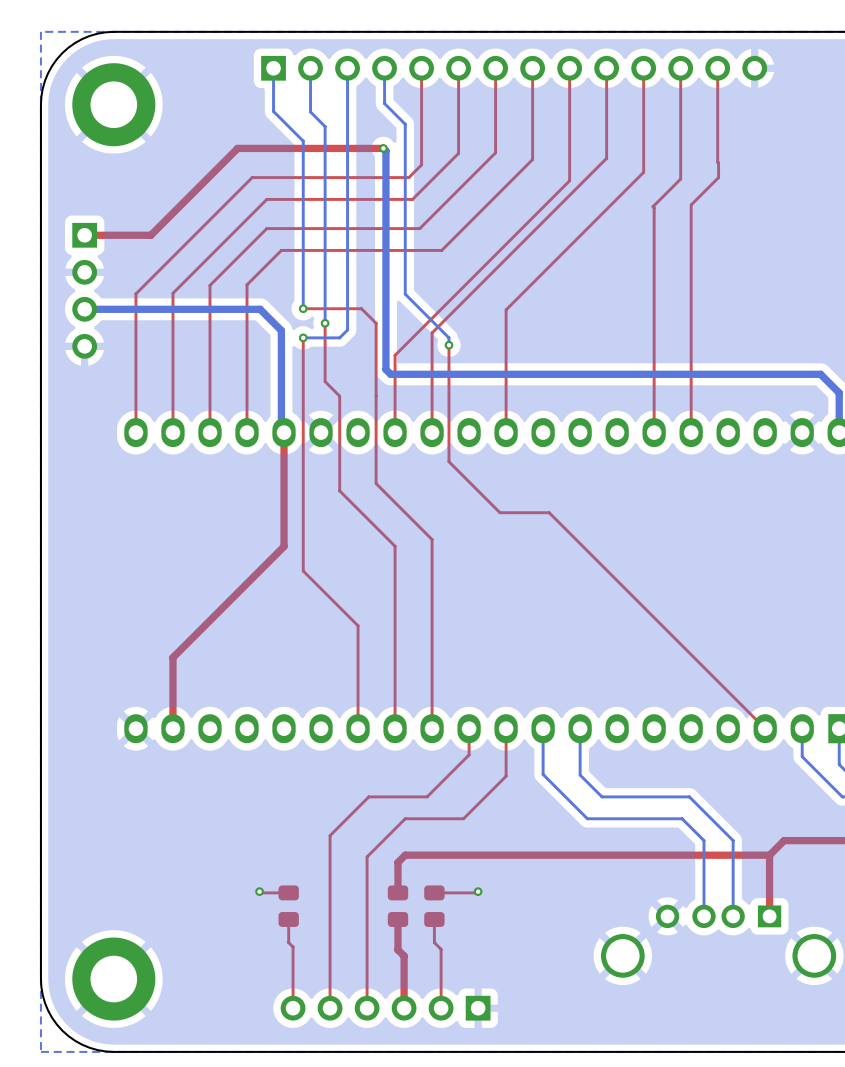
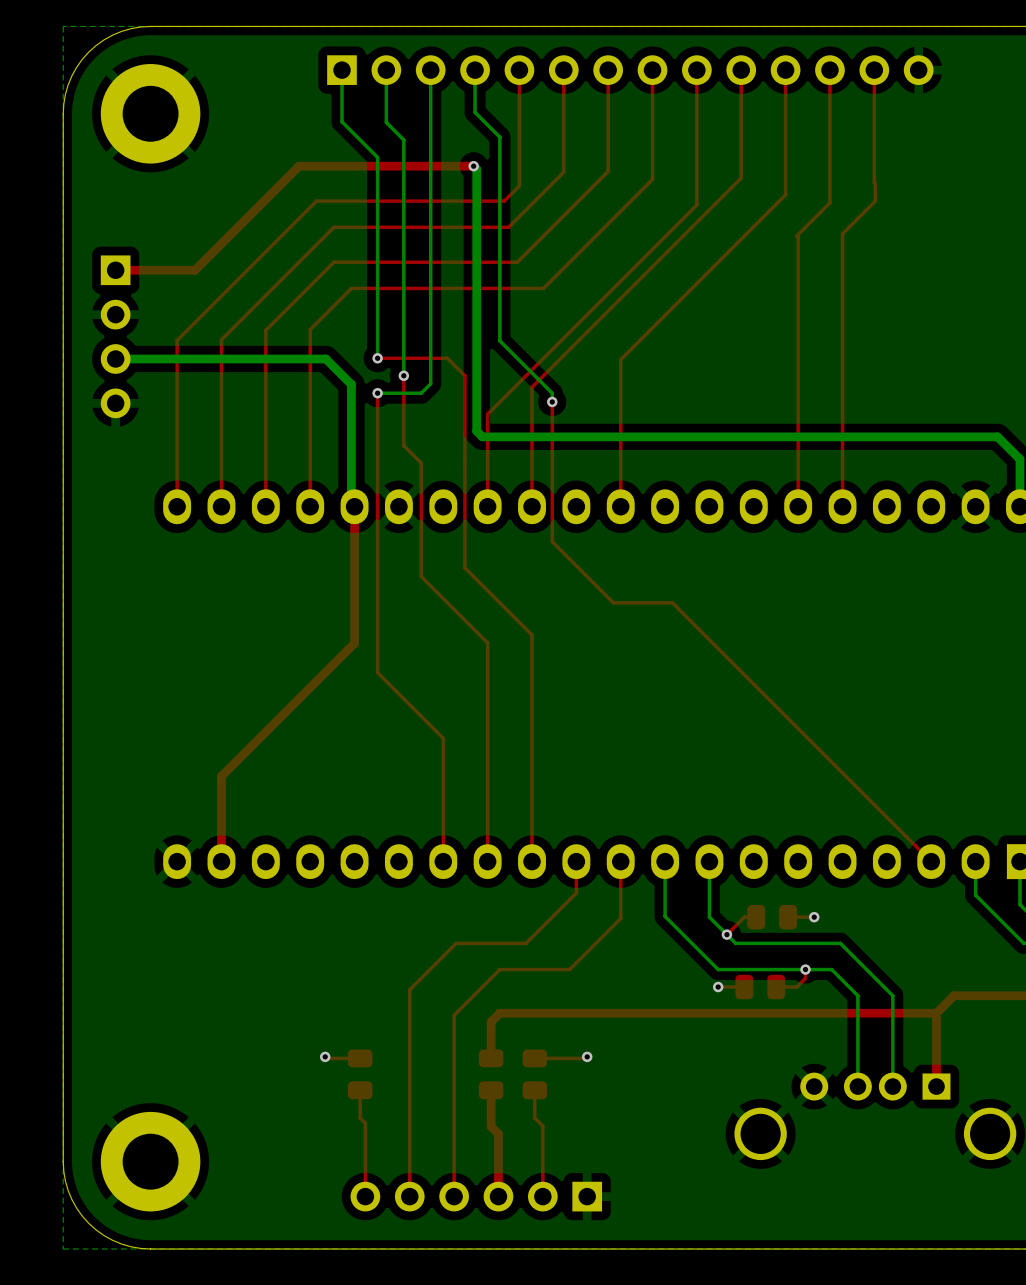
top track: none -> (756, 917) (744, 917) (726, 934)
part: none -> (772, 917)
top track: none -> (814, 917) (788, 917)
via: none -> (814, 917)
via: none -> (726, 934)
top track: none -> (805, 969) (805, 978) (796, 987) (776, 987)
via: none -> (805, 969)
via: none -> (718, 987)
top track: none -> (744, 987) (718, 987)
part: none -> (760, 987)

